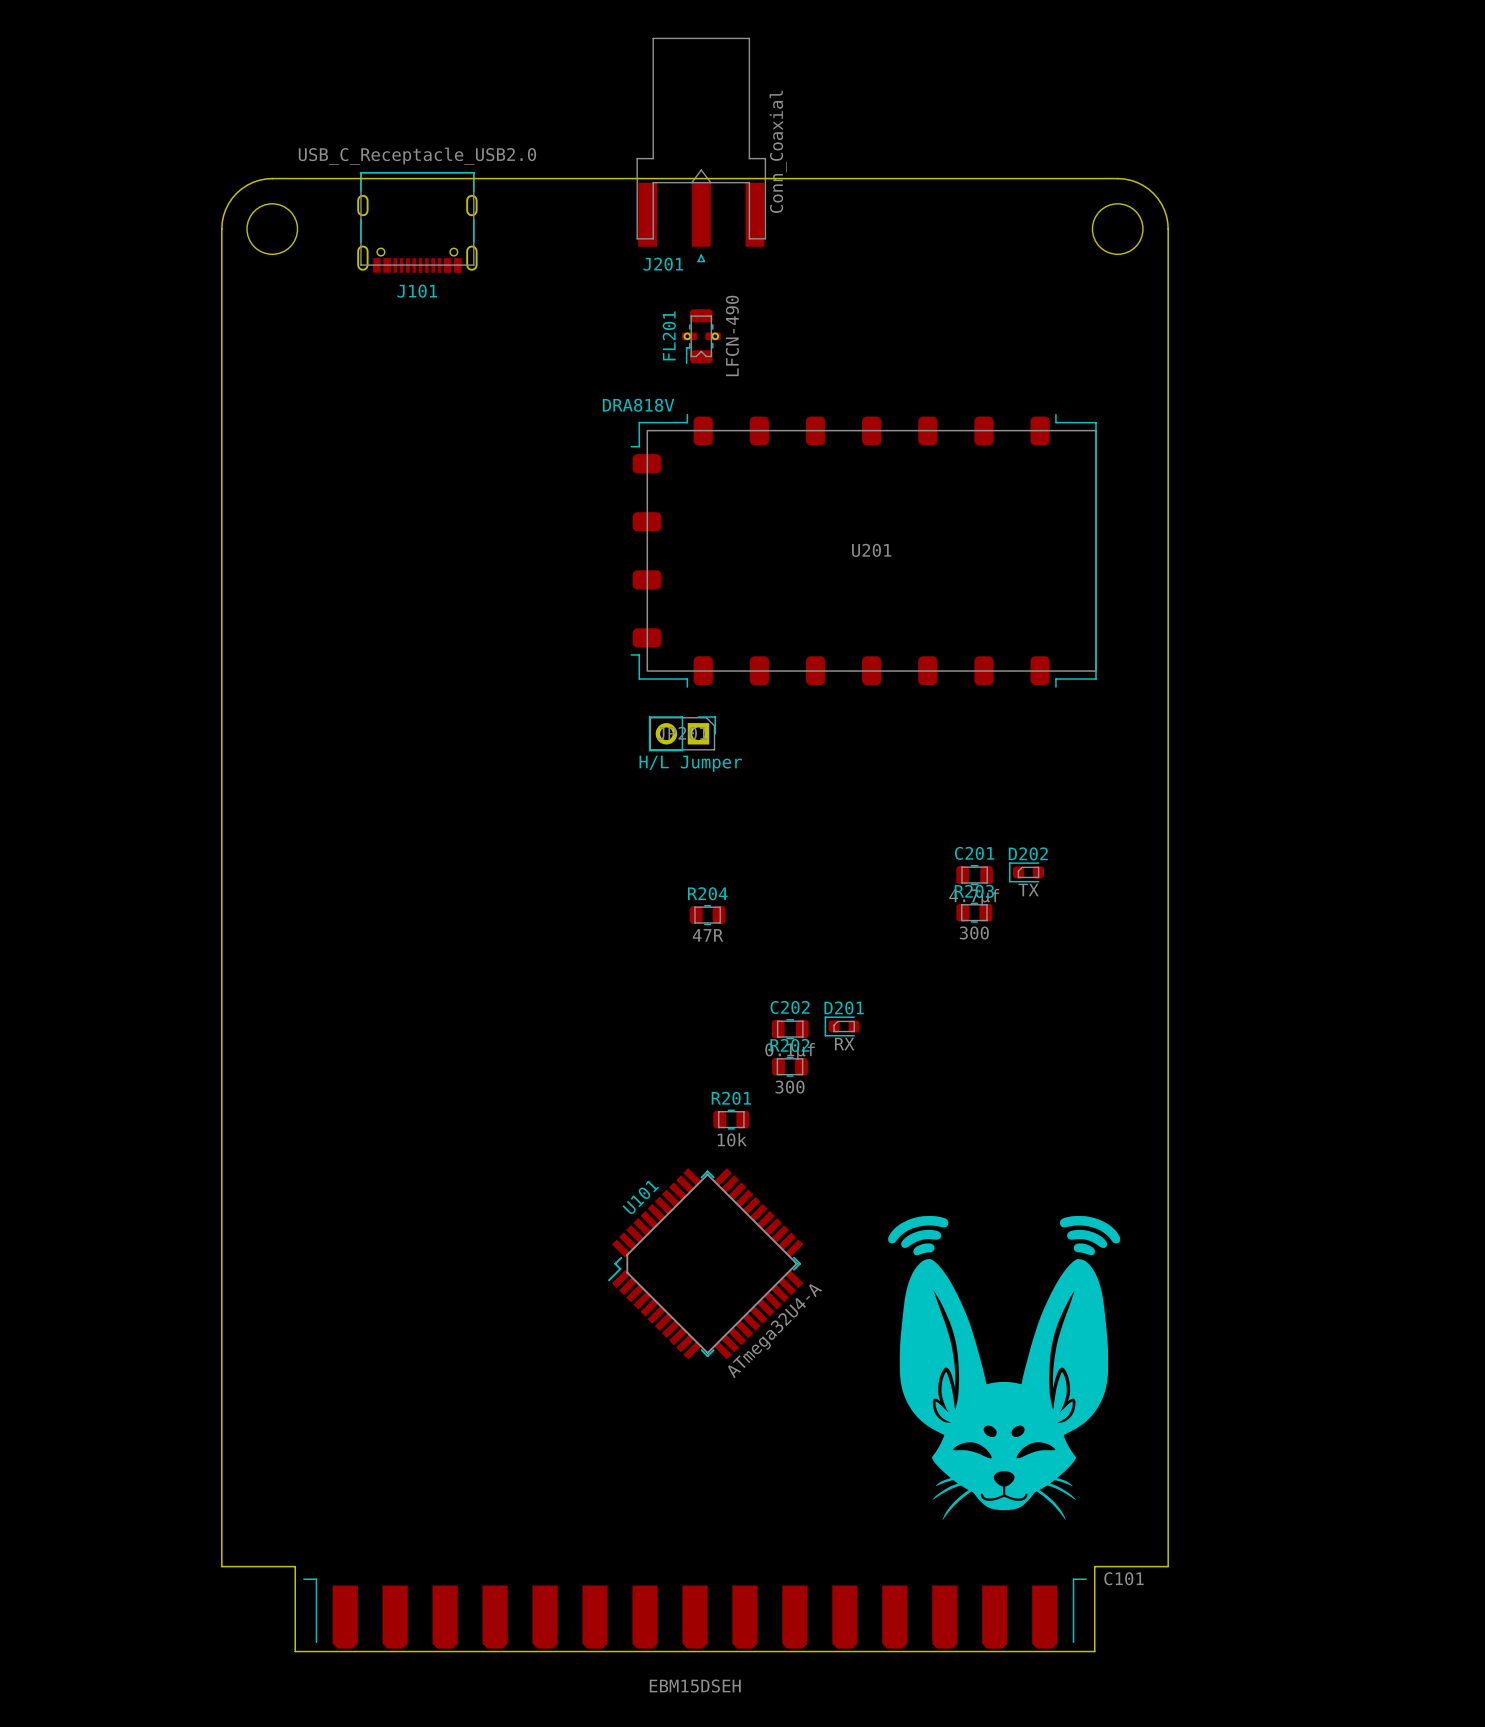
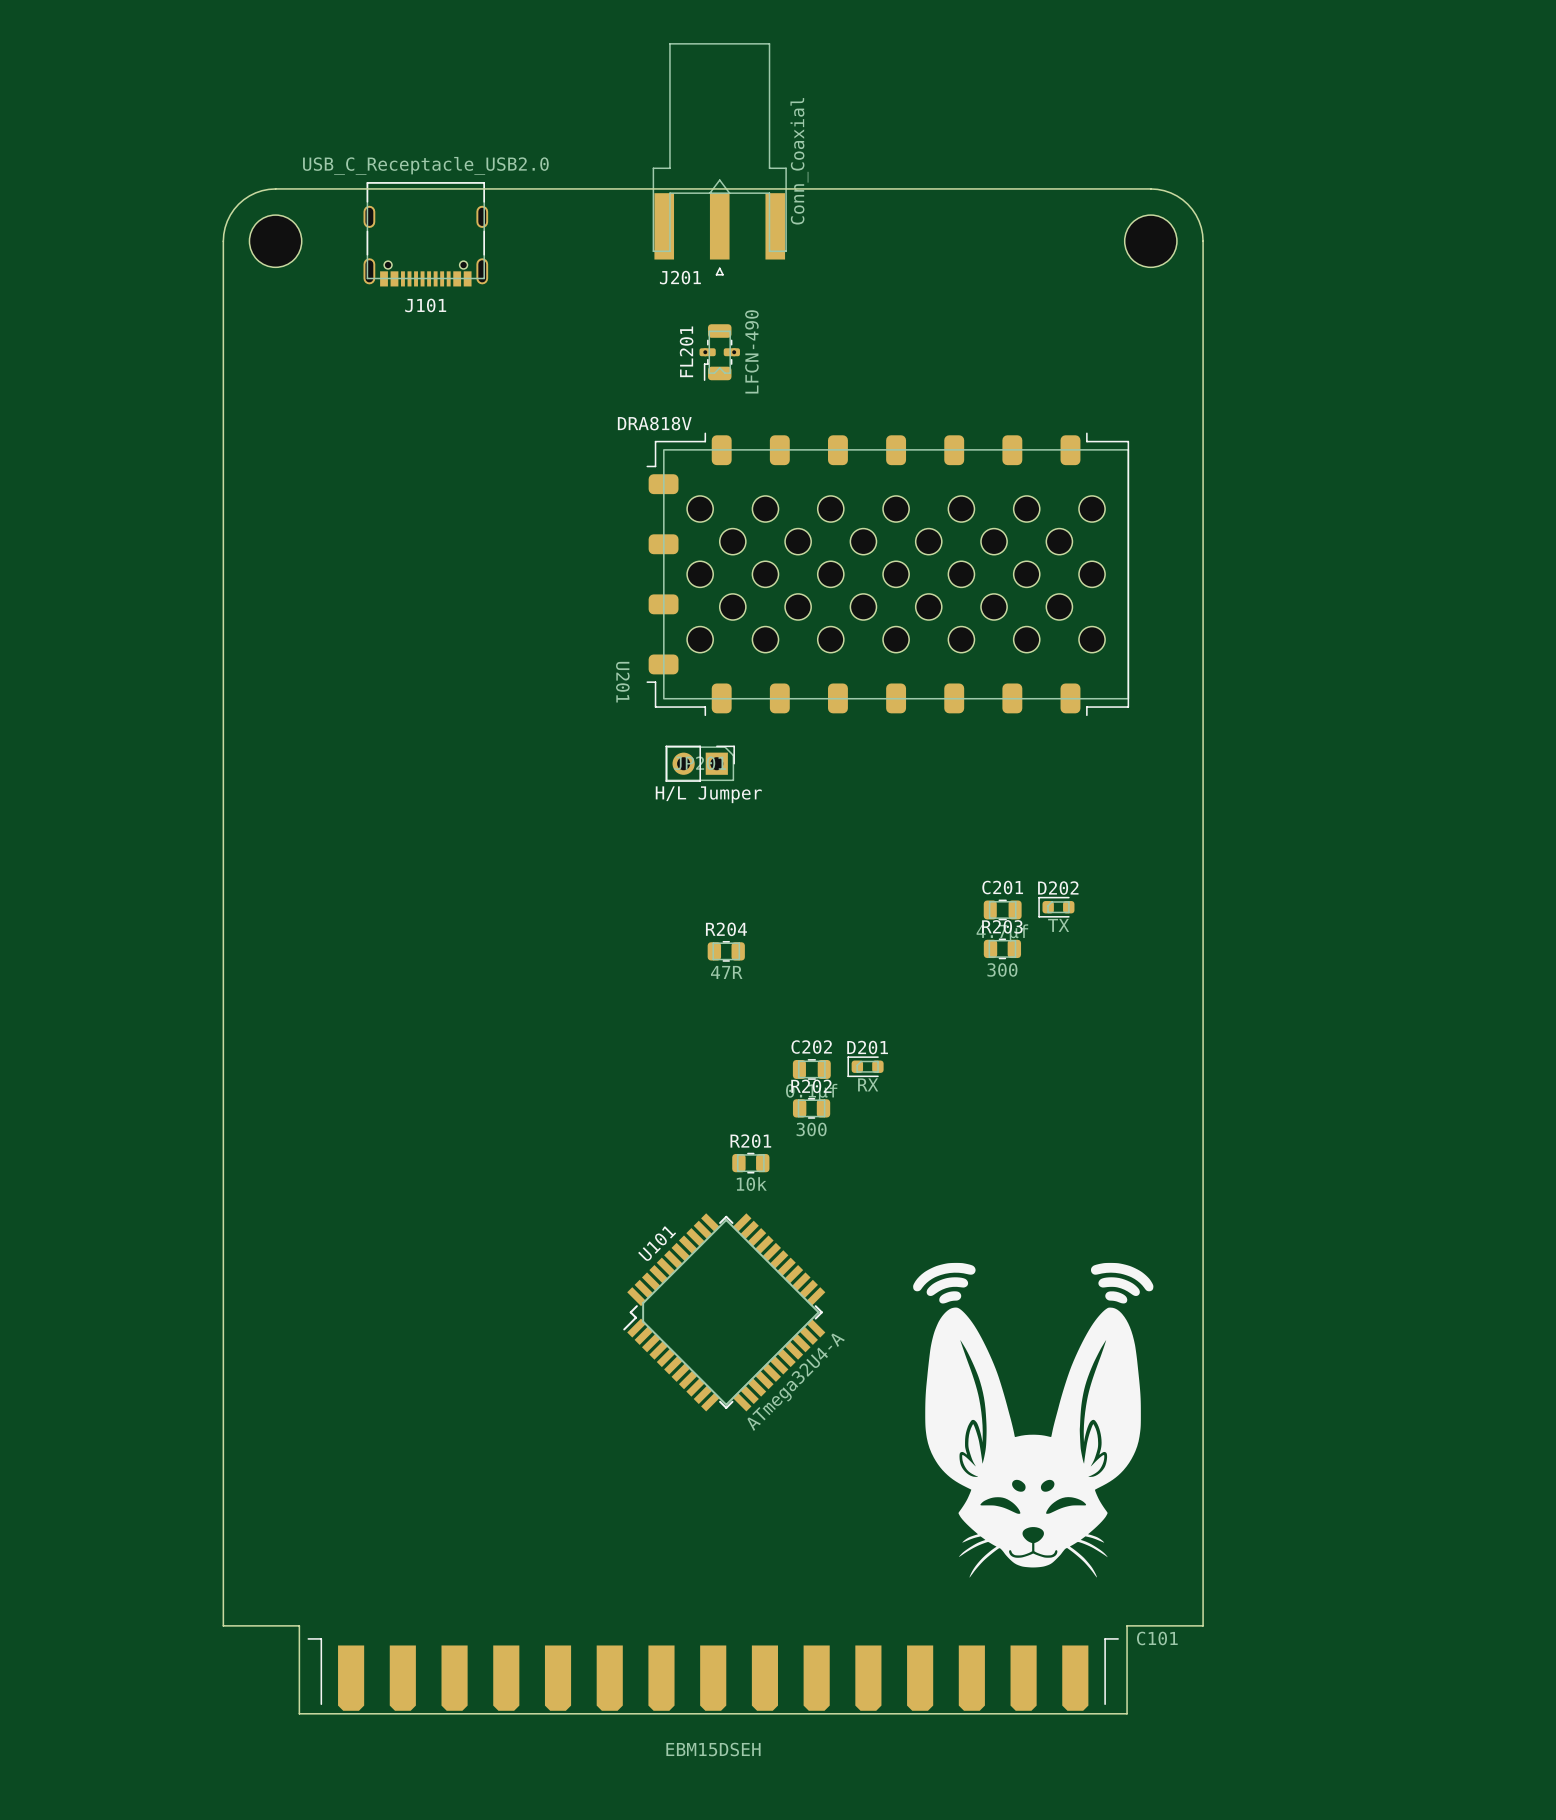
U201 footprint: [630, 413, 1097, 688] -> [646, 432, 1130, 717]
U201 name position: U201 (871, 550) -> U201 (622, 682)

